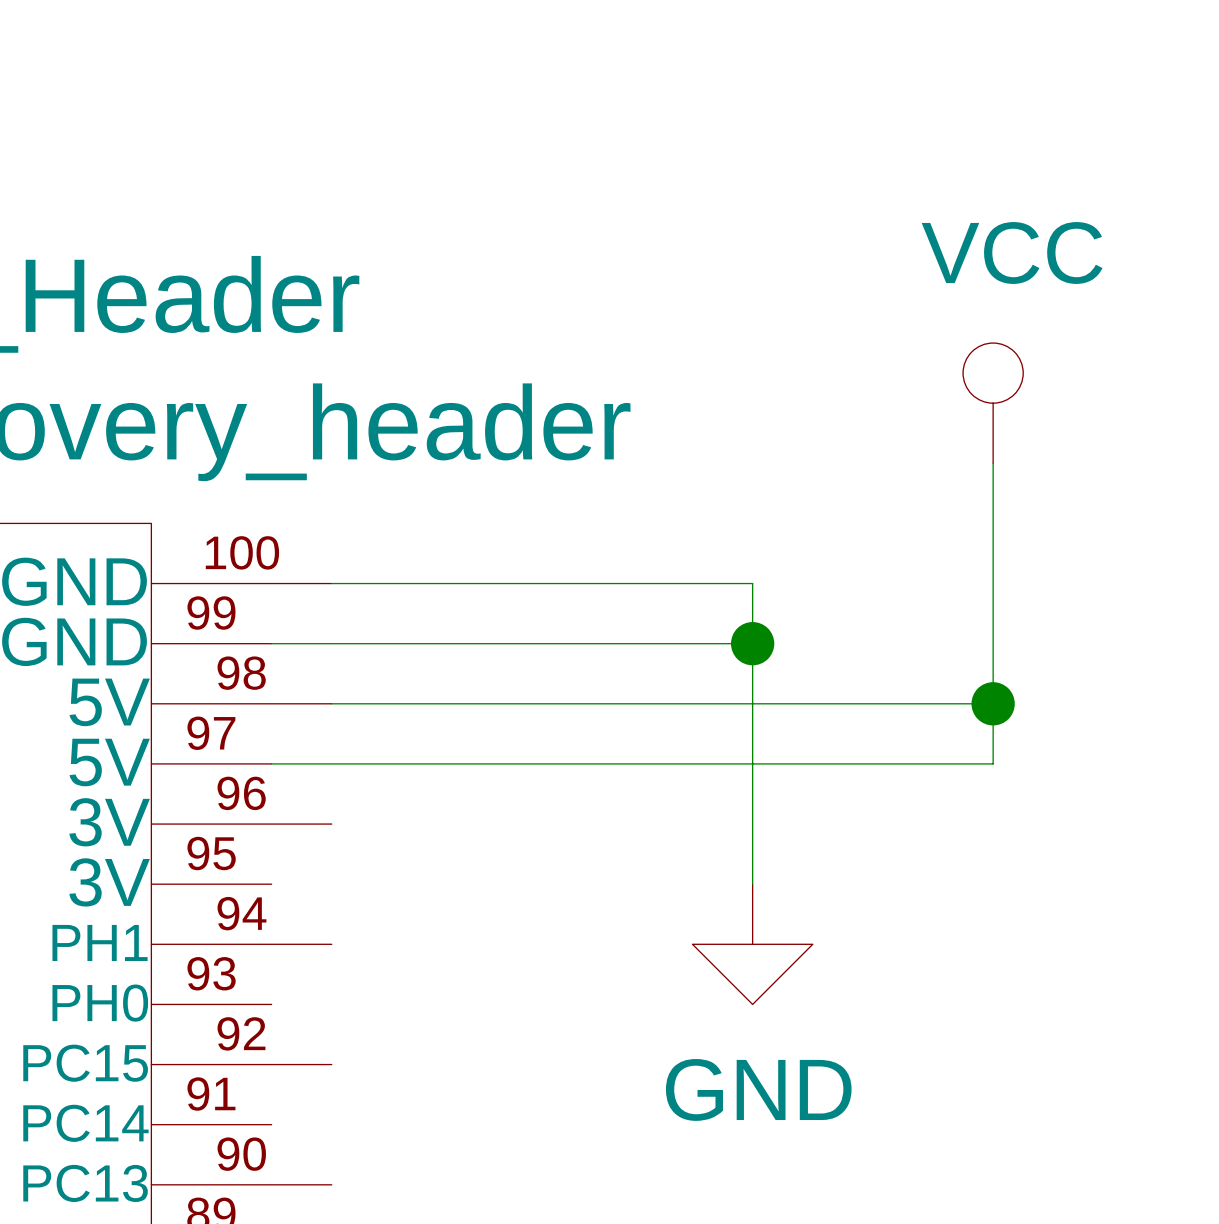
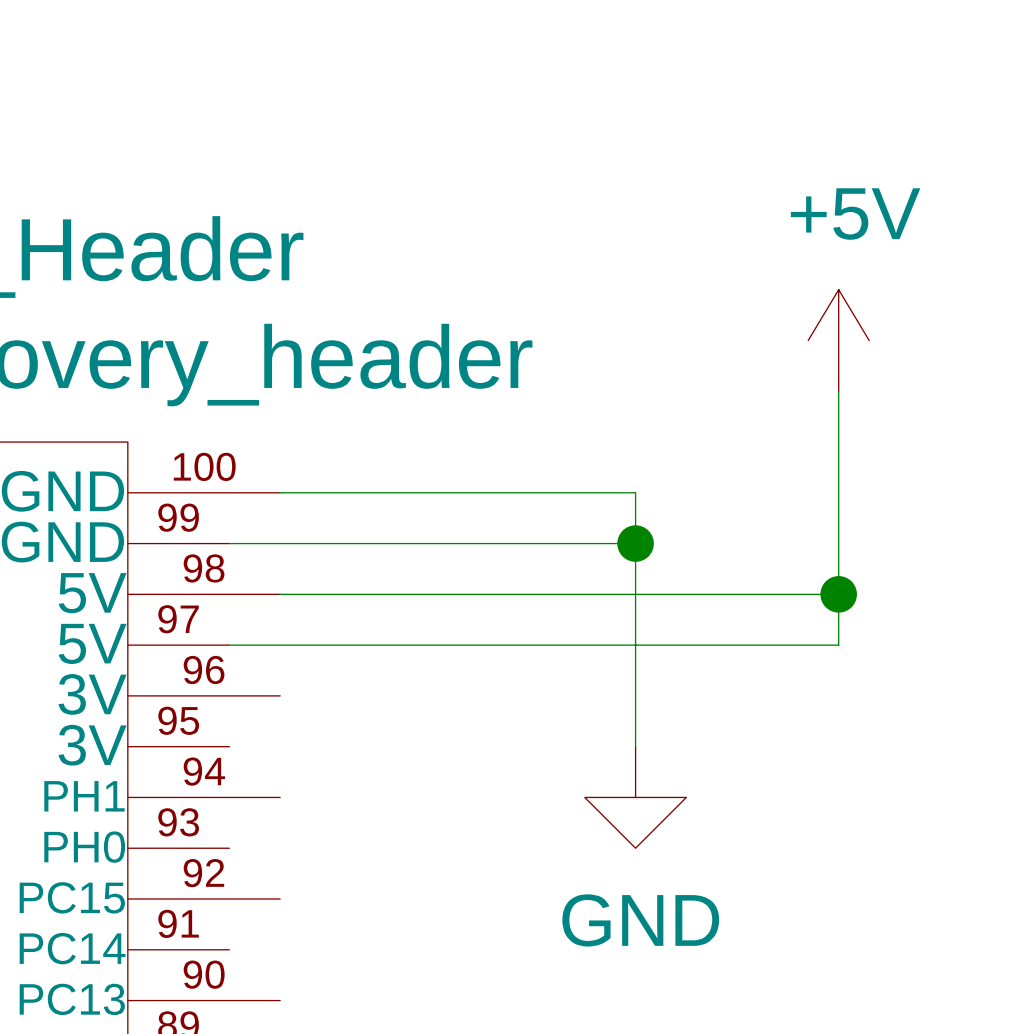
power symbol: VCC (993, 403) -> +5V (838, 340)

